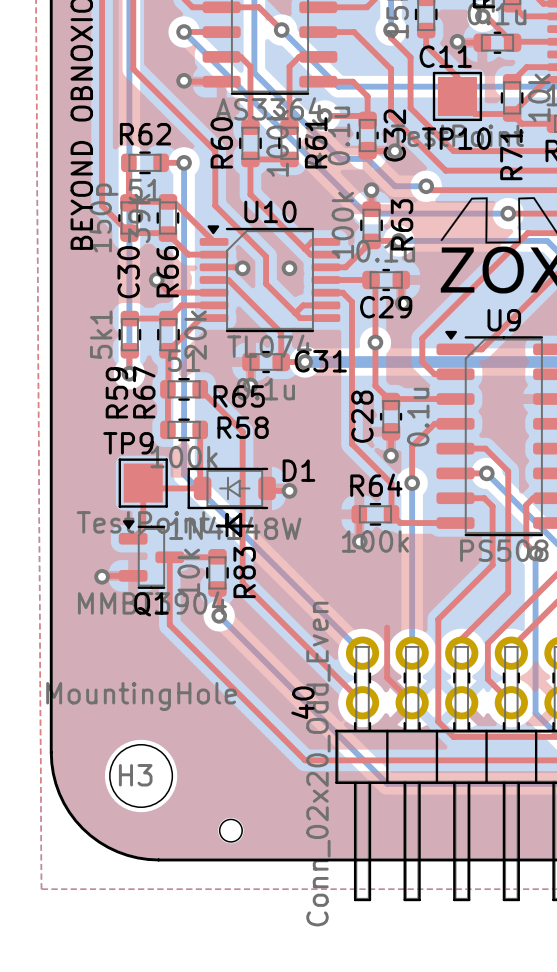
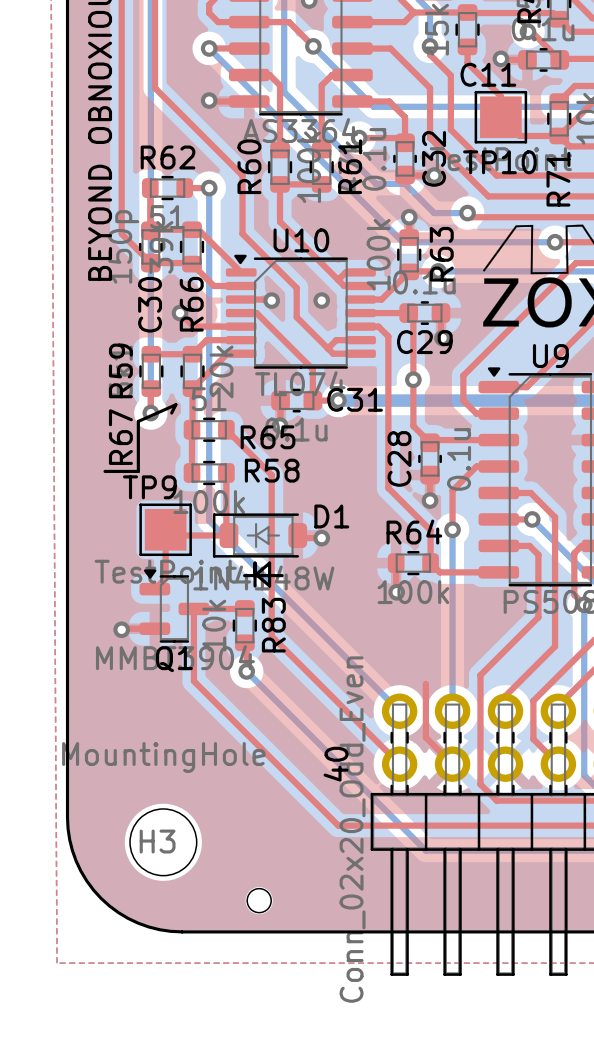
line: none -> (171, 413) (175, 404) (138, 421) (138, 471) (105, 471)
R59 name position: R59 (116, 392) -> R59 (120, 370)
R67 name position: R67 (144, 392) -> R67 (120, 437)

